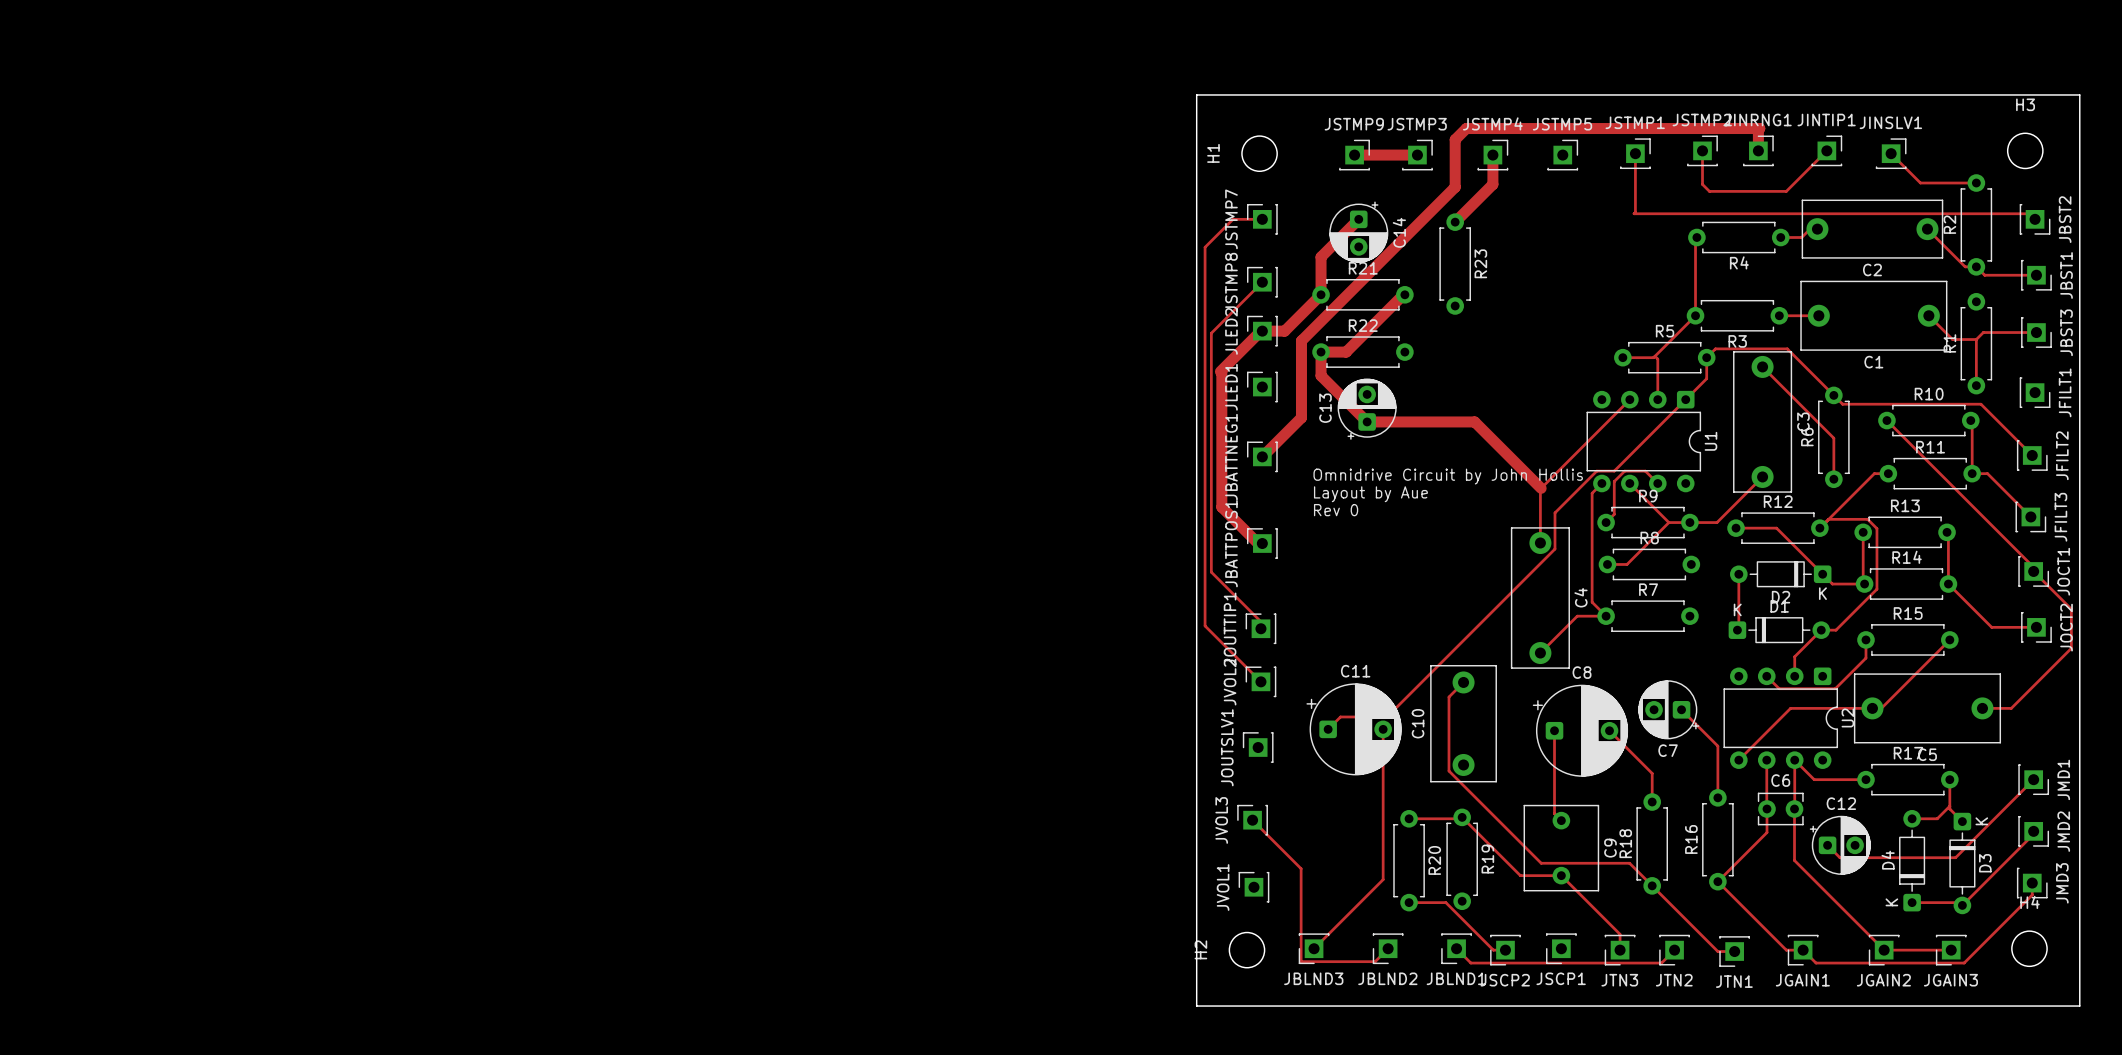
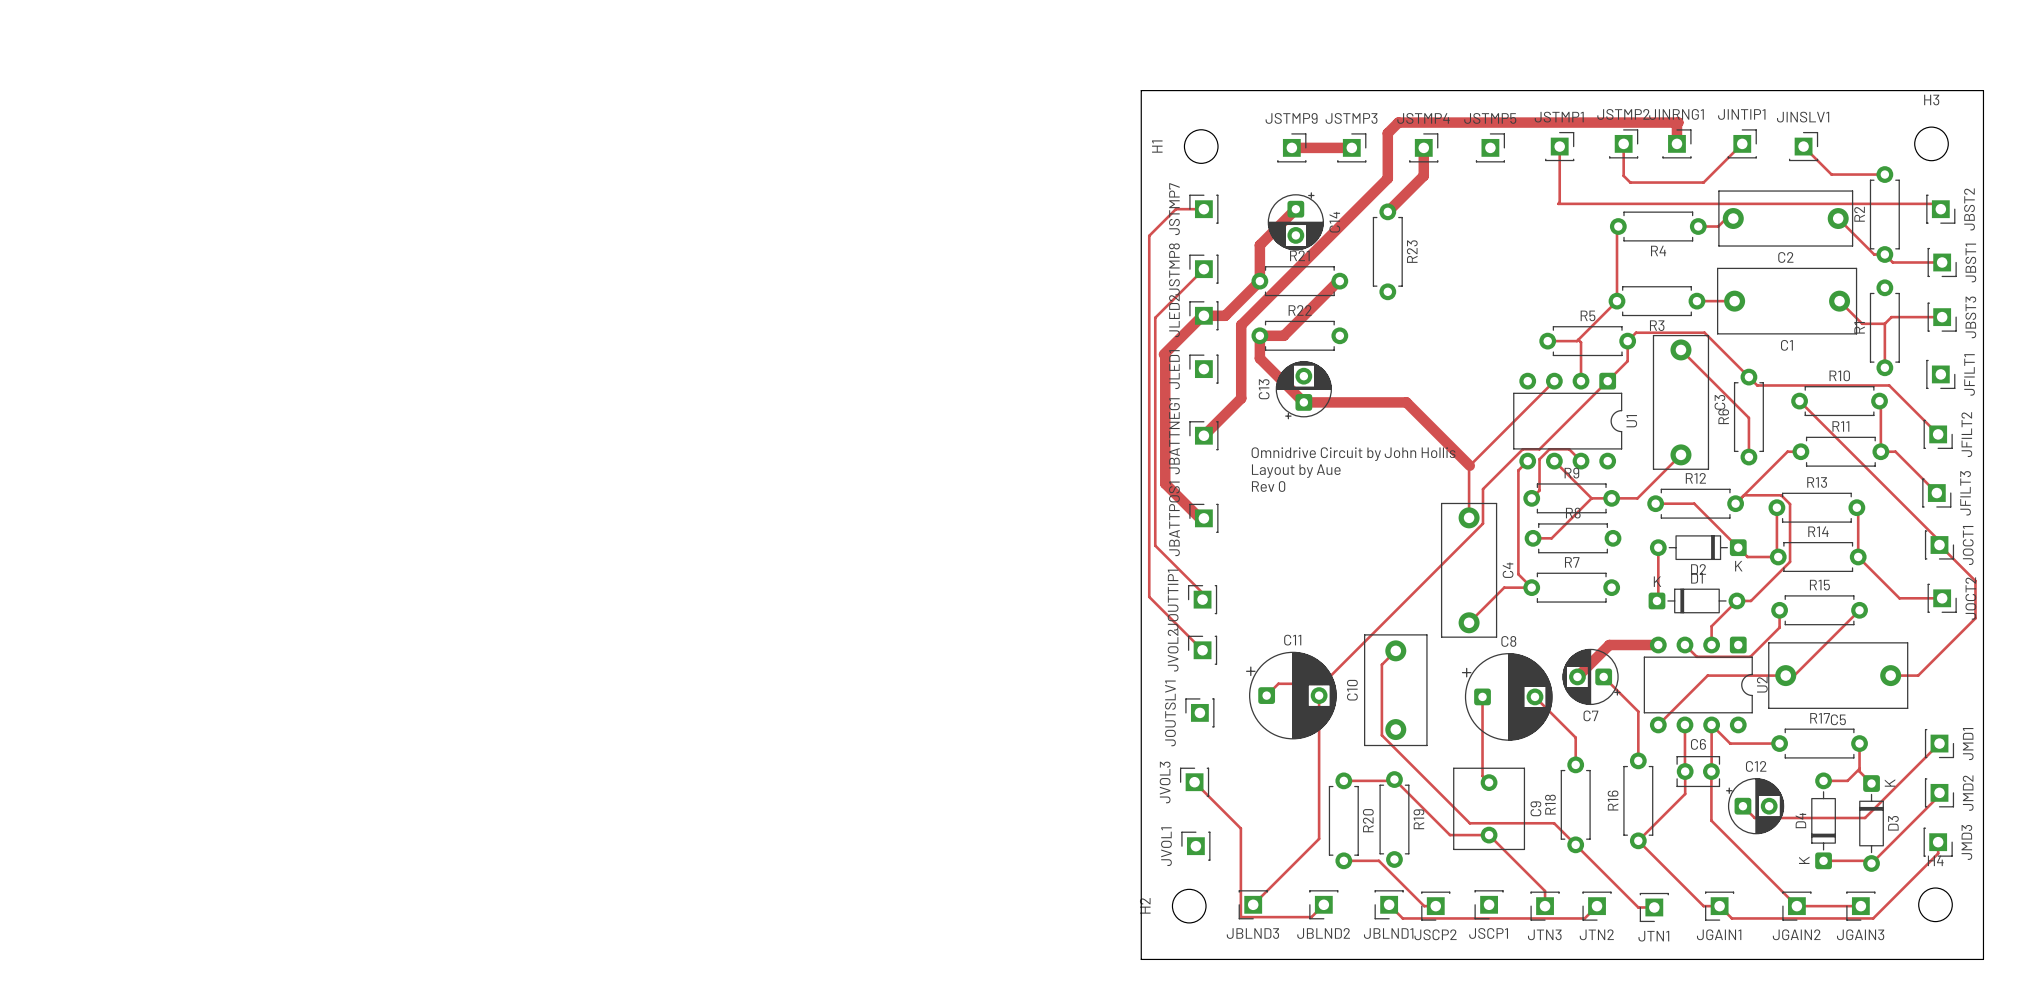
track: none -> (1658, 645) (1609, 645) (1577, 676)

